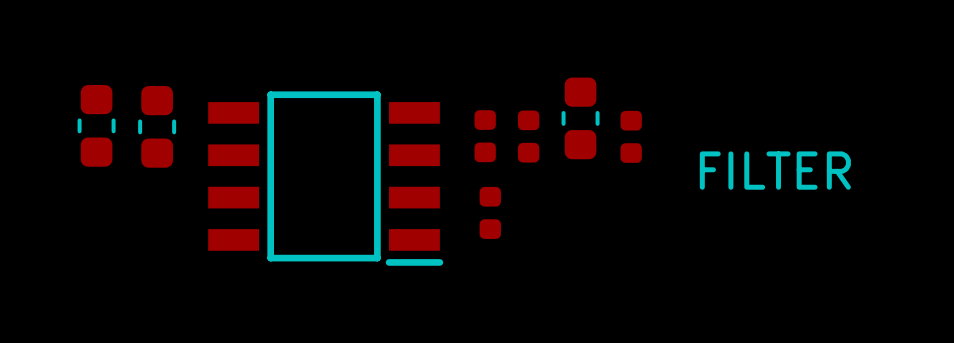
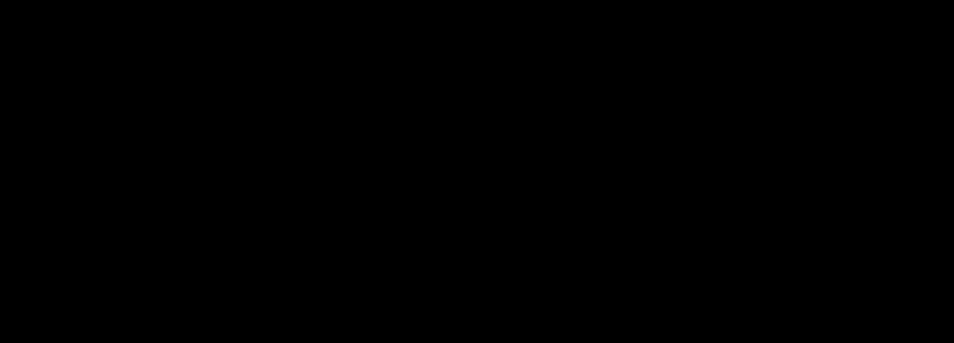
part: (580, 118) -> none
part: (96, 125) -> none
part: (157, 126) -> none
part: (485, 136) -> none
part: (528, 136) -> none
part: (631, 136) -> none
text: FILTER (775, 170) -> none
part: (325, 178) -> none
part: (490, 212) -> none

